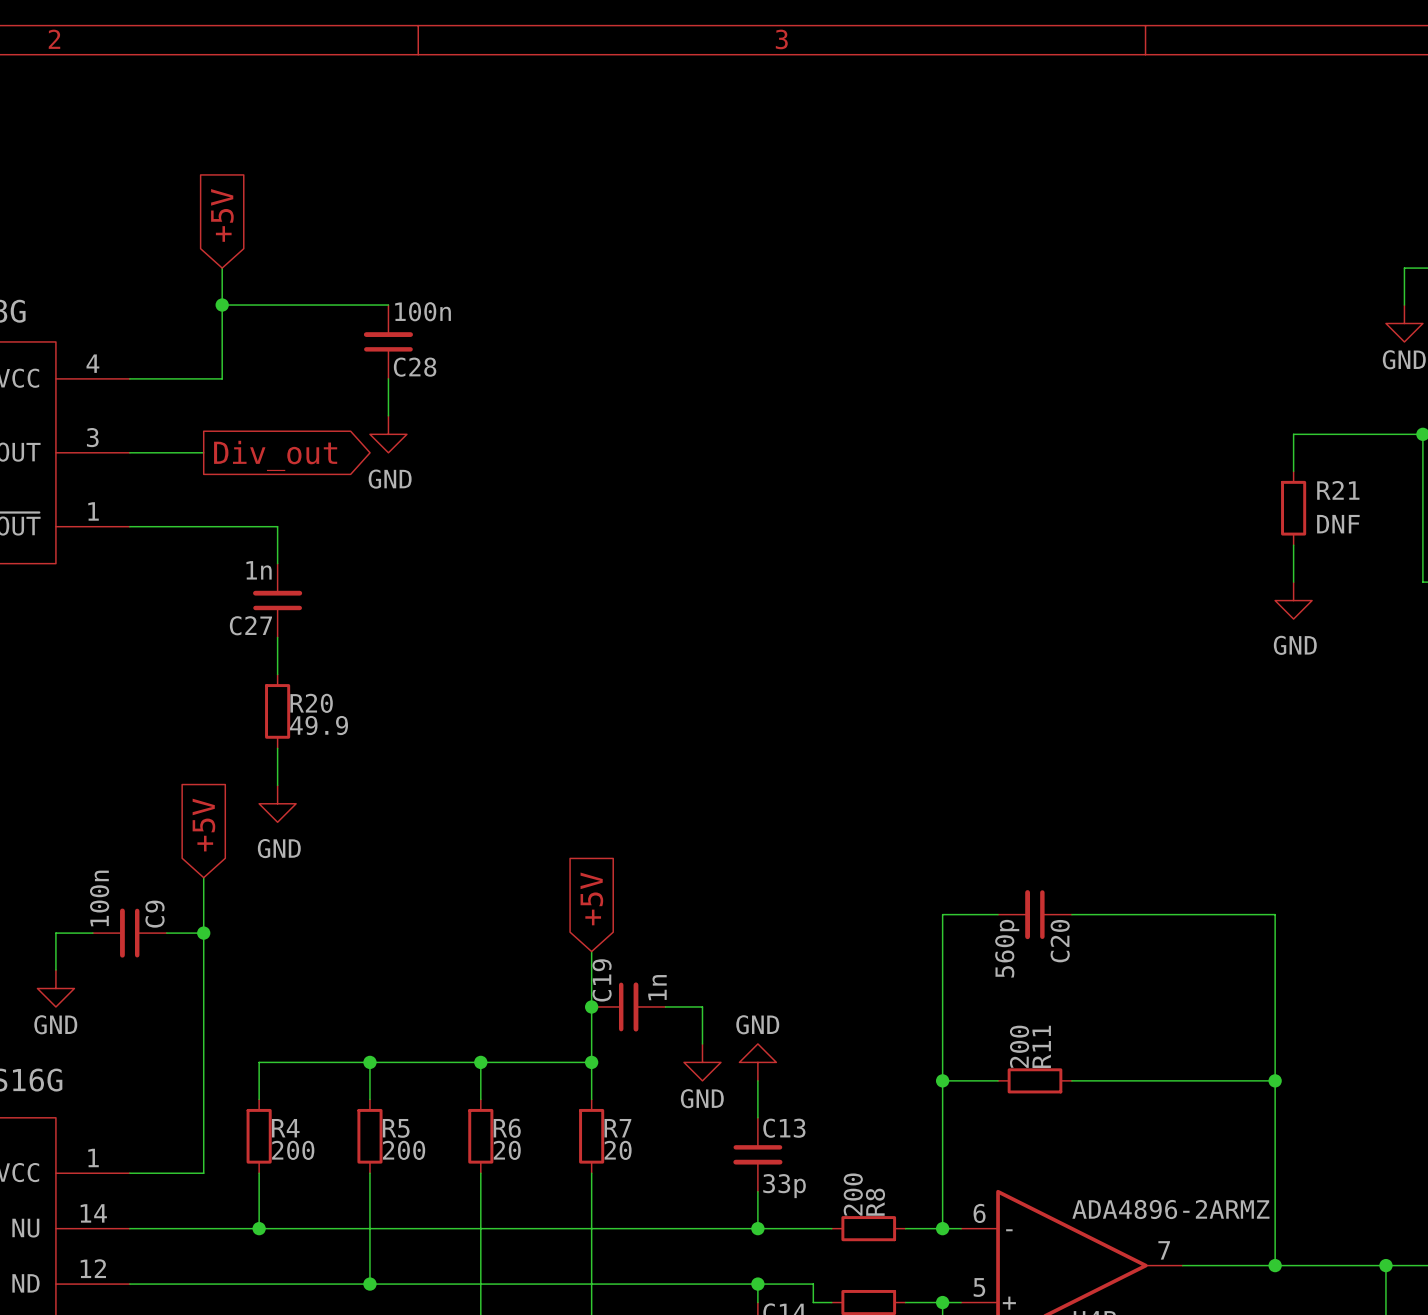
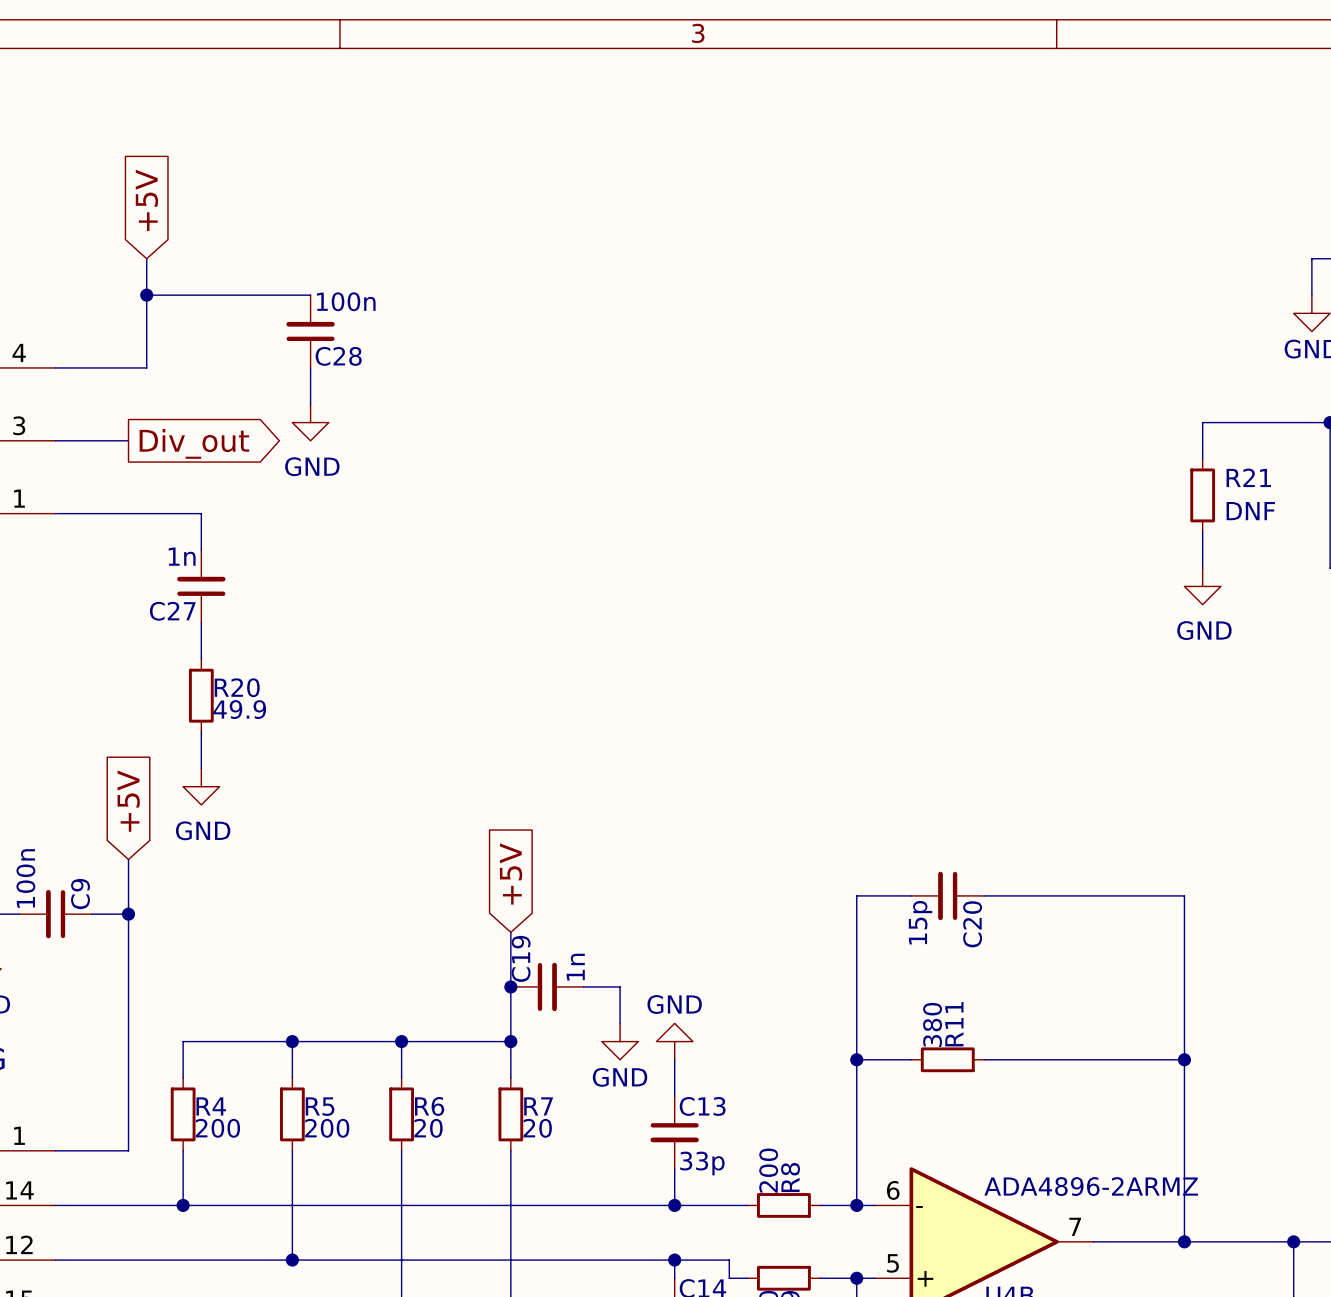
C20 value: 560p (1007, 948) -> 15p (920, 922)
R11 value: 200 (1019, 1046) -> 380 (932, 1024)

